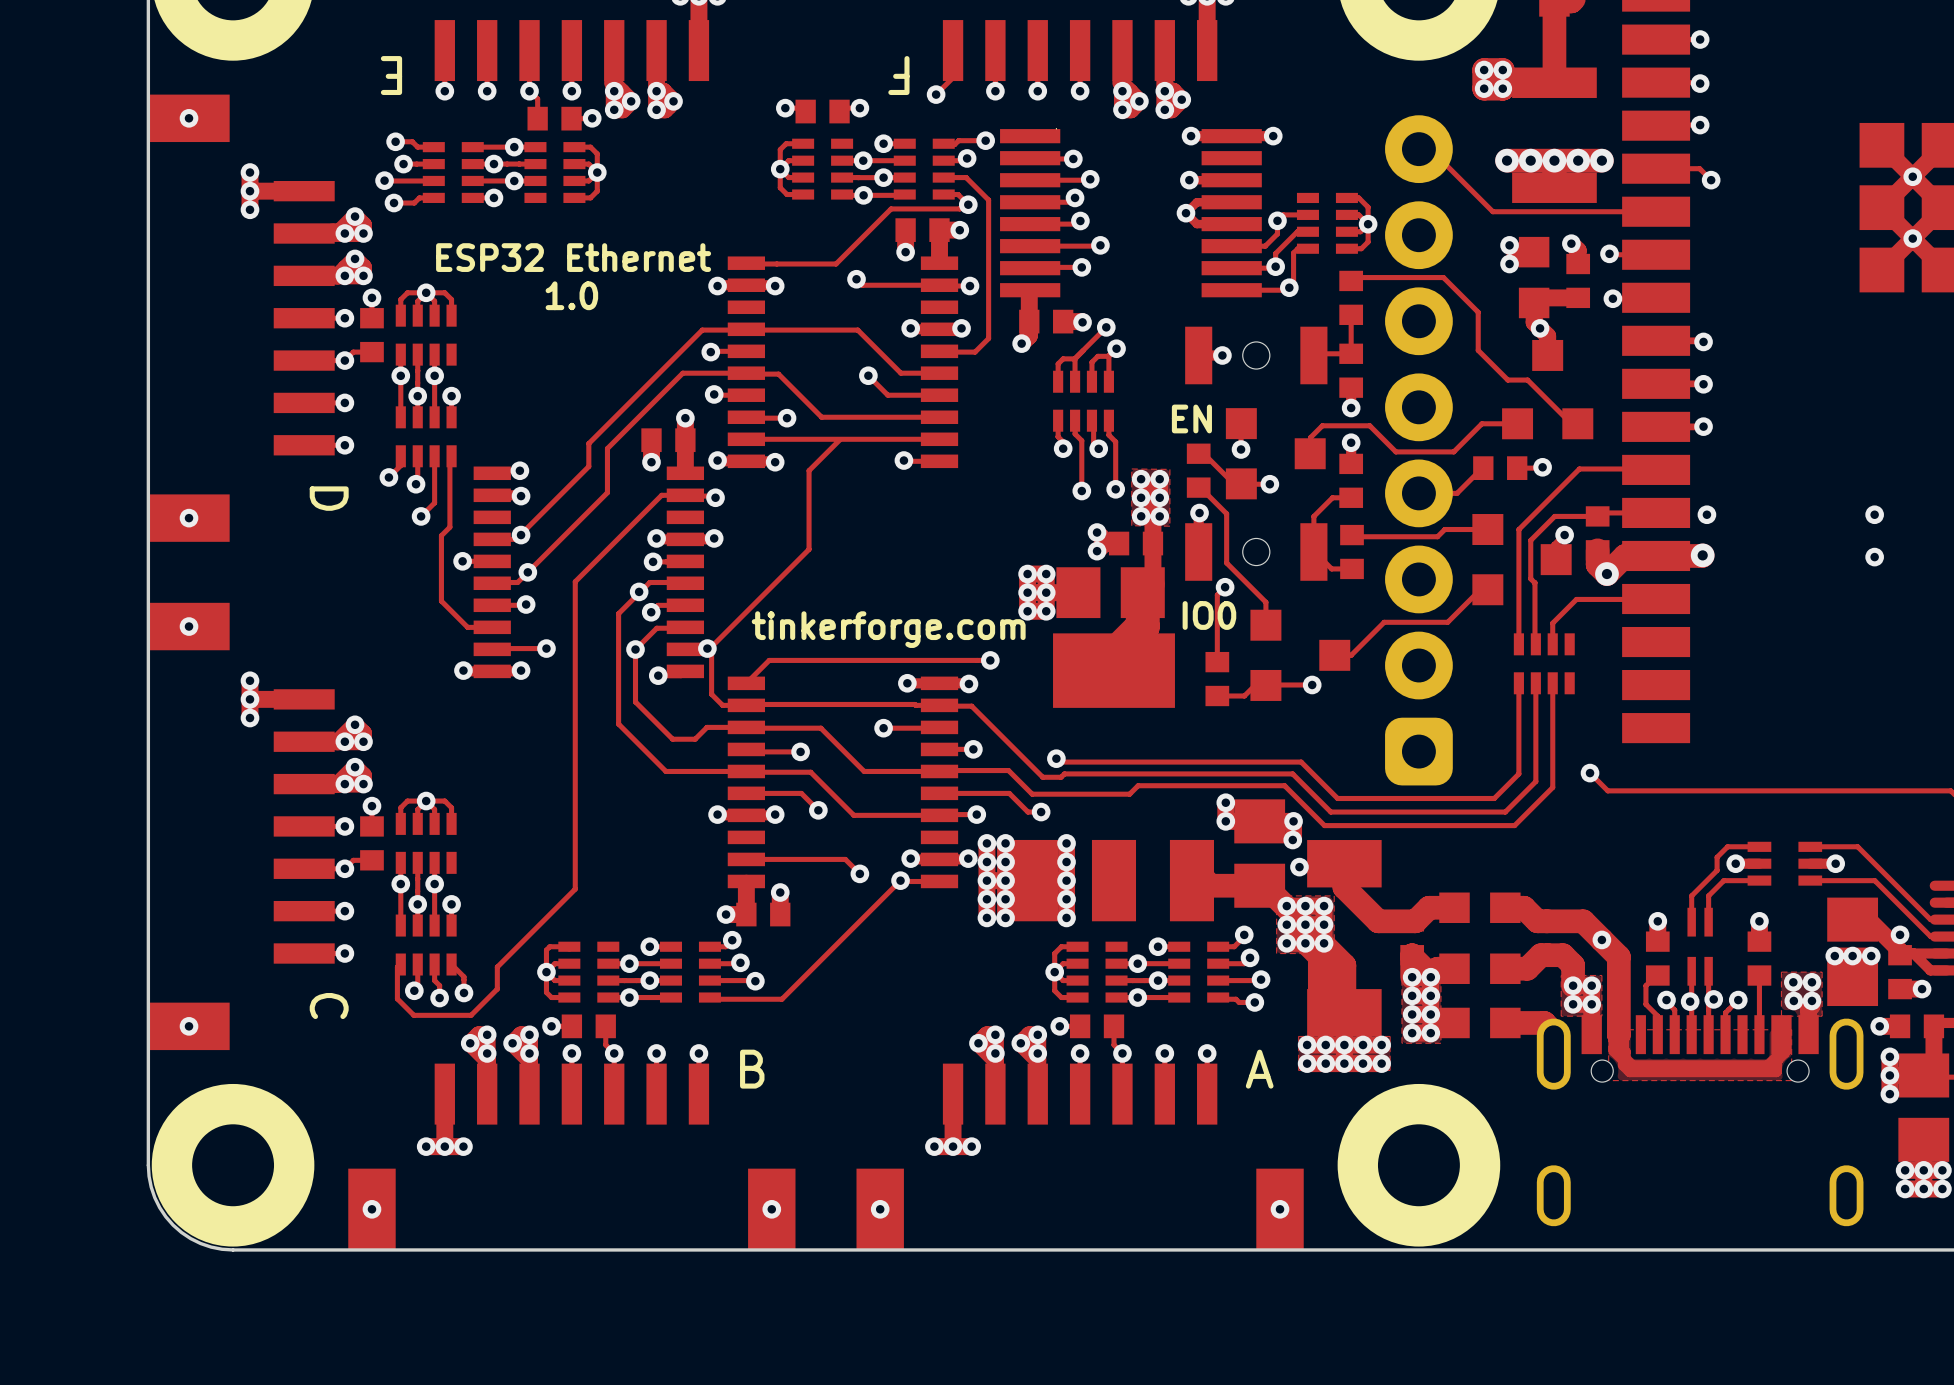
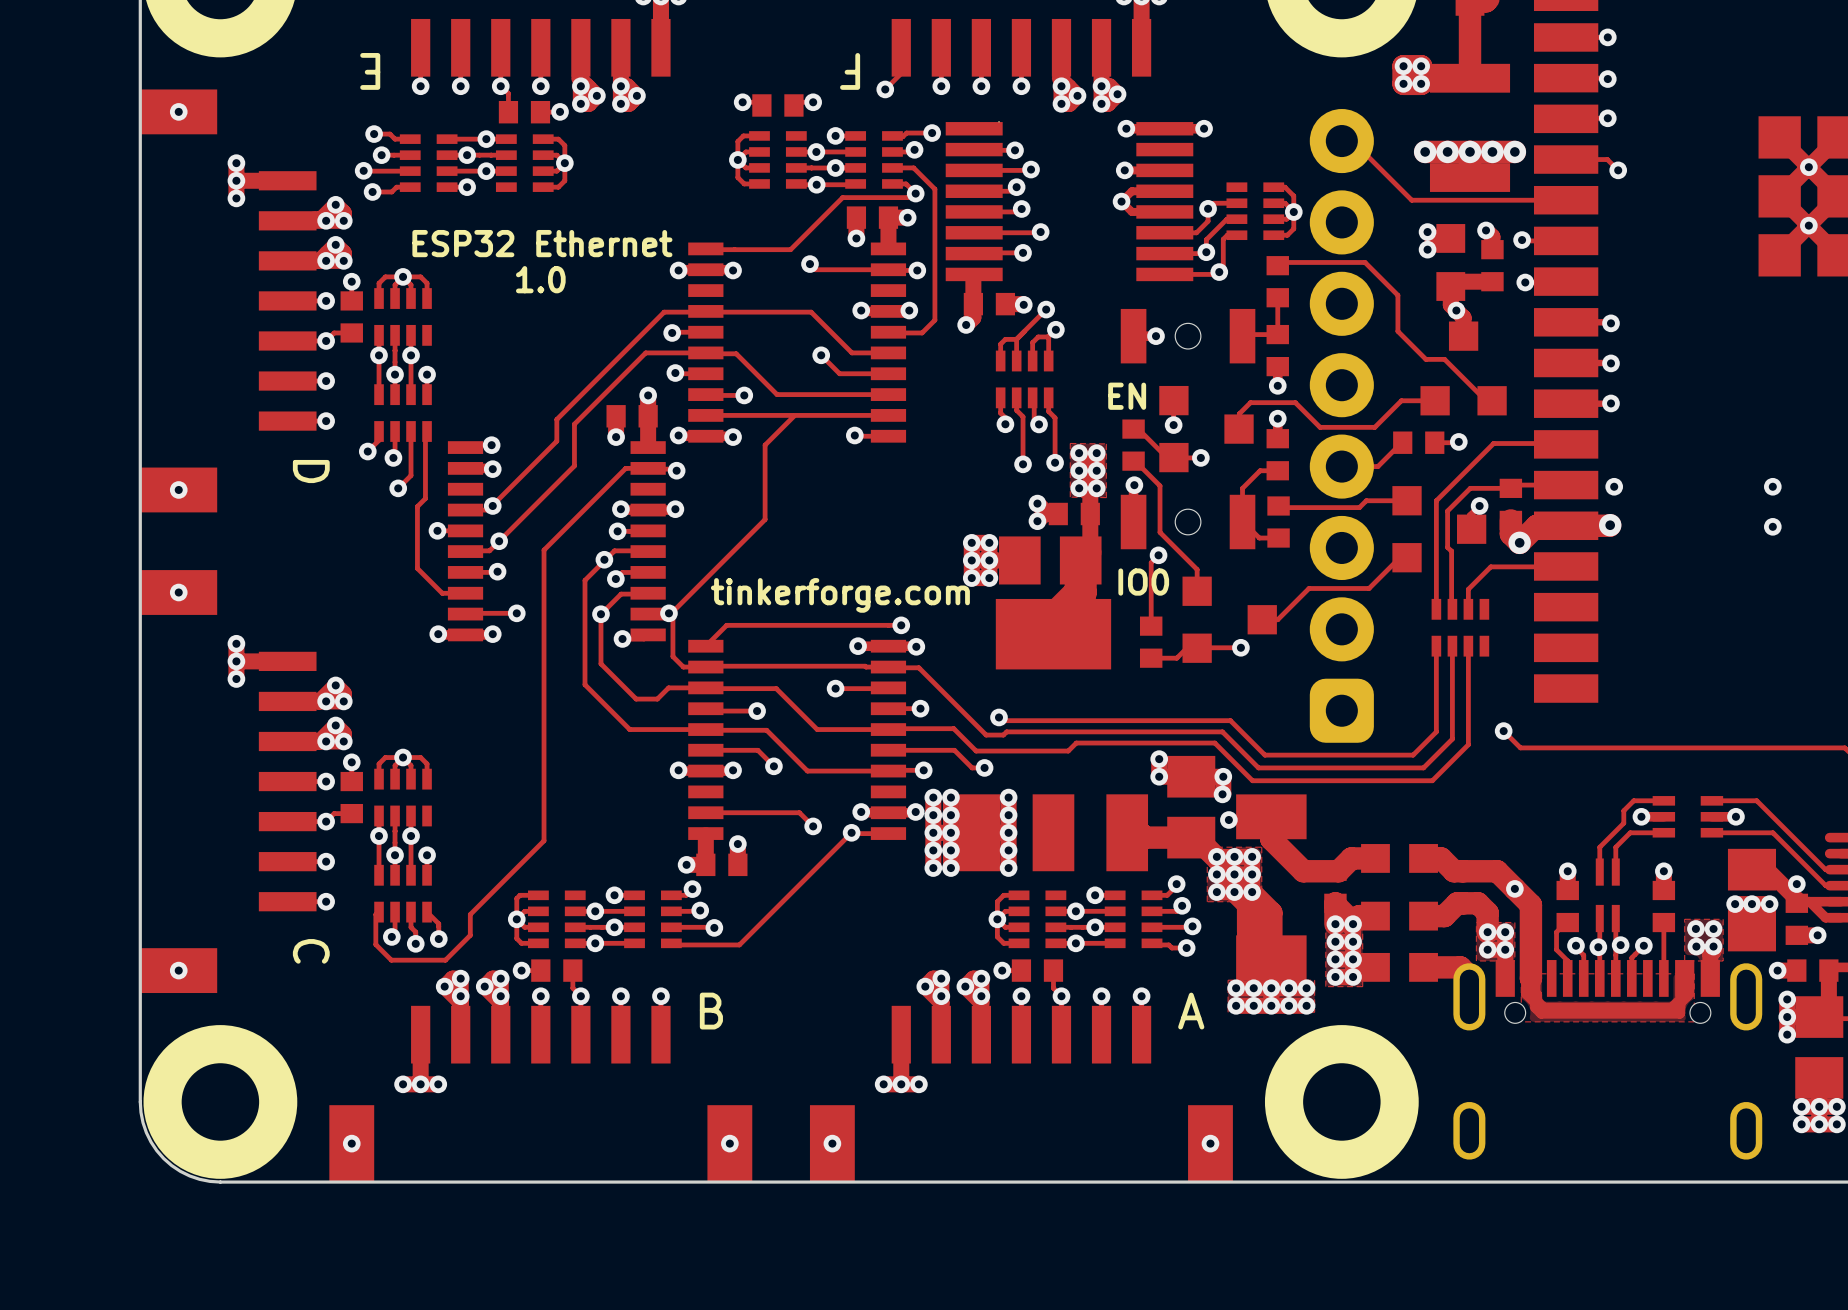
track: (990, 660) (768, 661) -> (901, 625) (726, 625)
via position: (990, 660) -> (901, 625)

